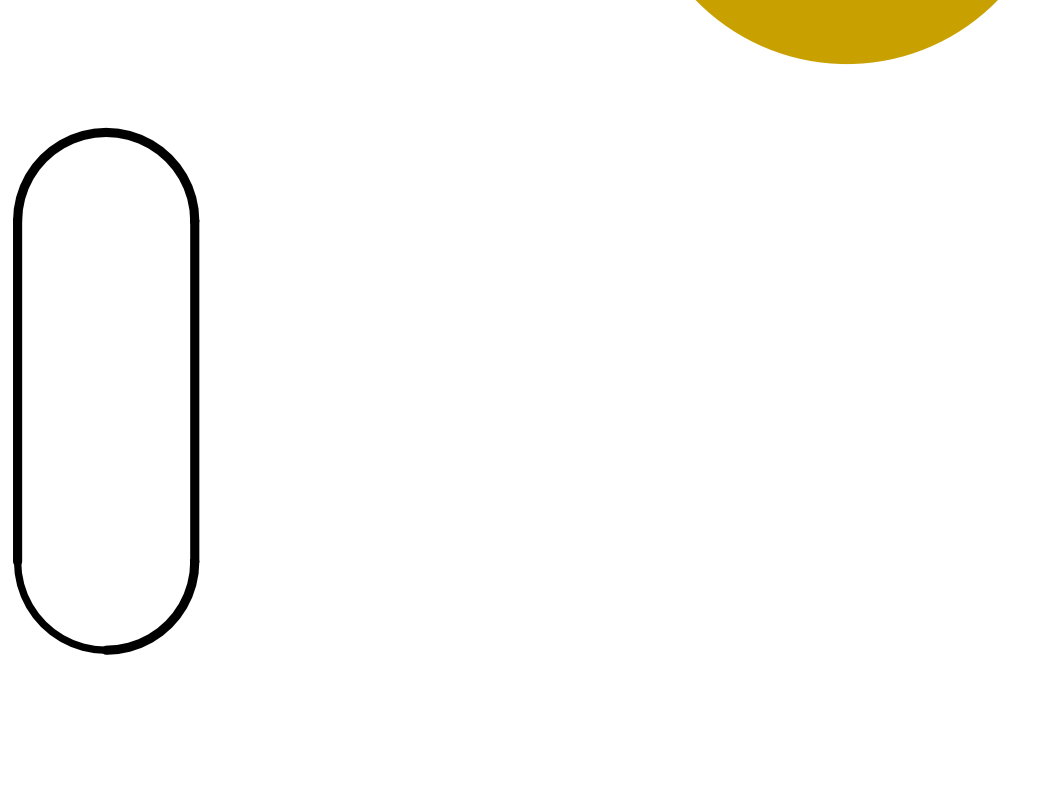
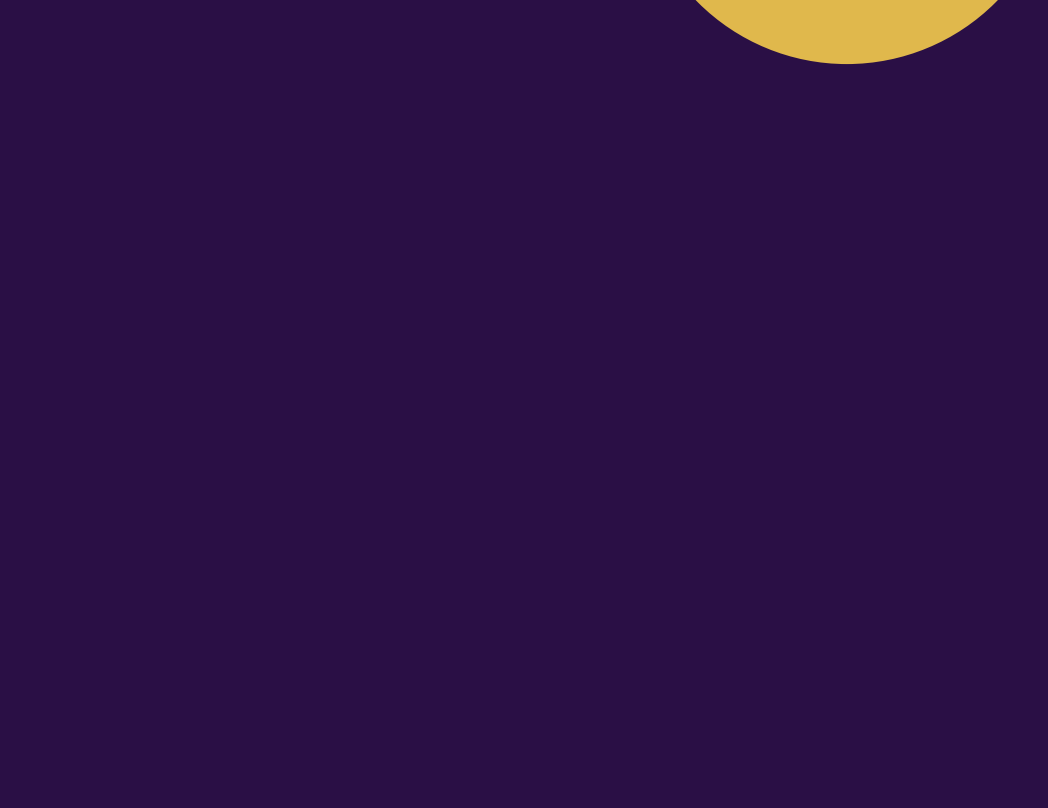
part: (106, 391) -> none

